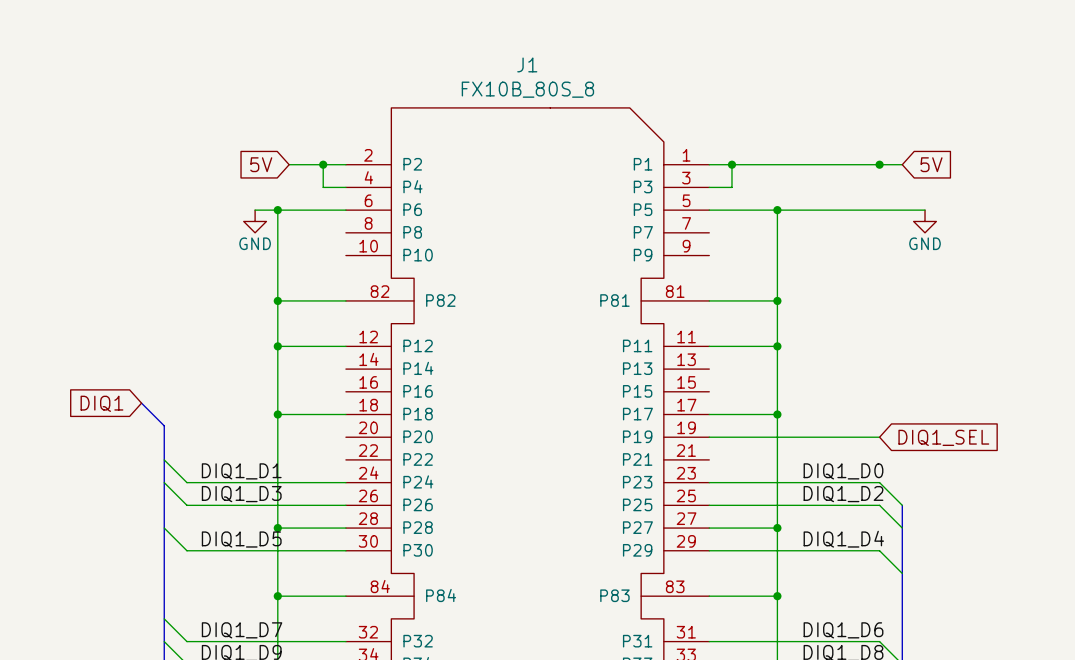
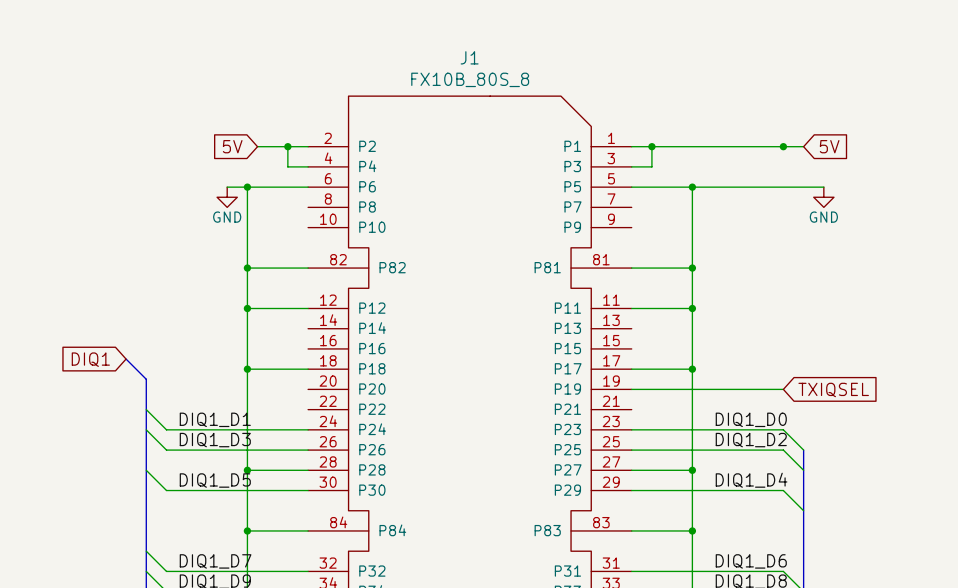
global label: DIQ1_SEL (943, 437) -> TXIQSEL (833, 389)

